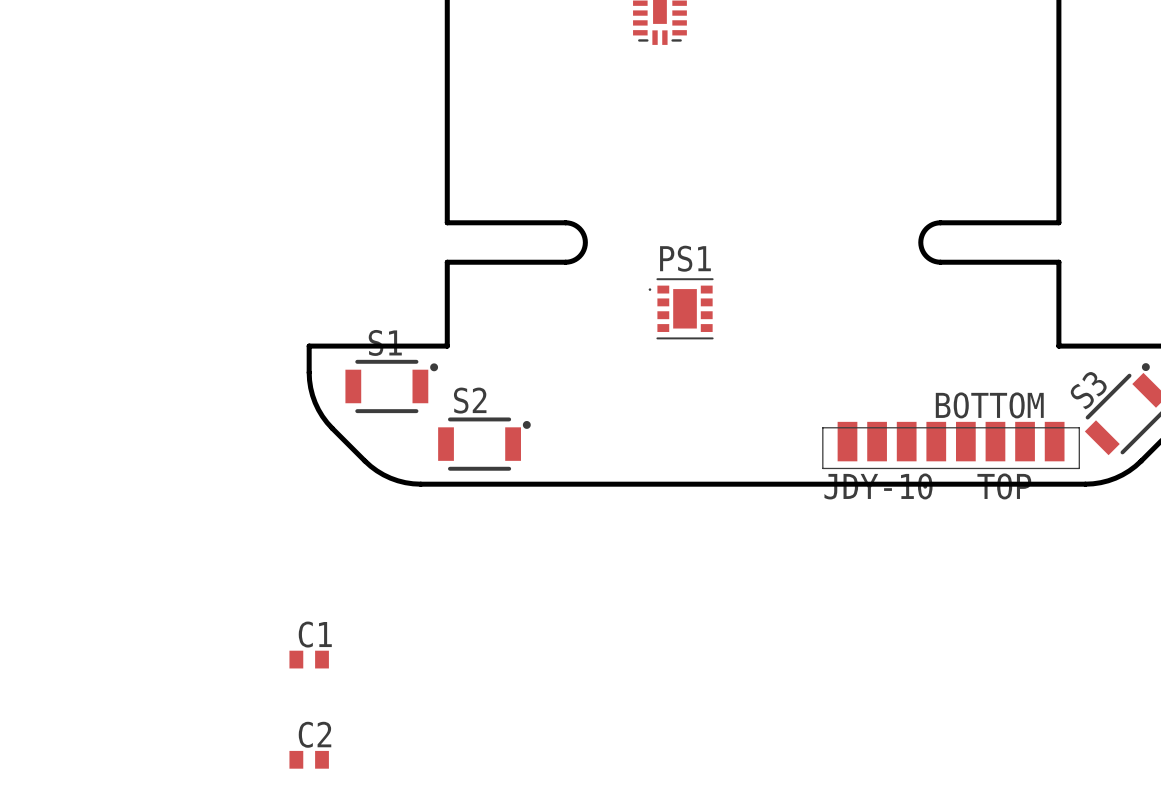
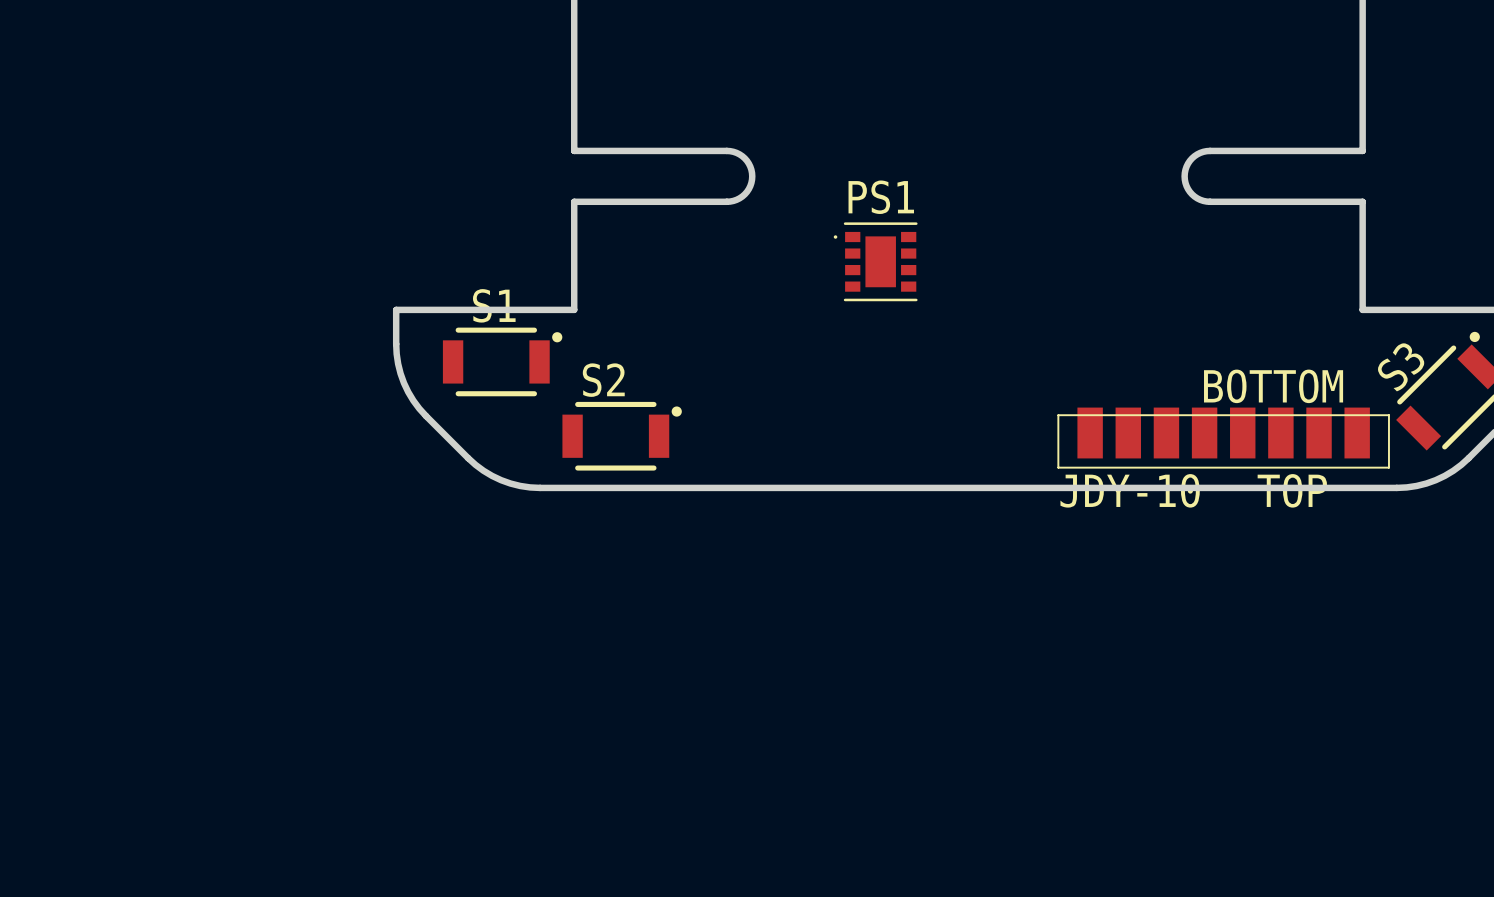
C1: (309, 659) -> none
C2: (309, 759) -> none

